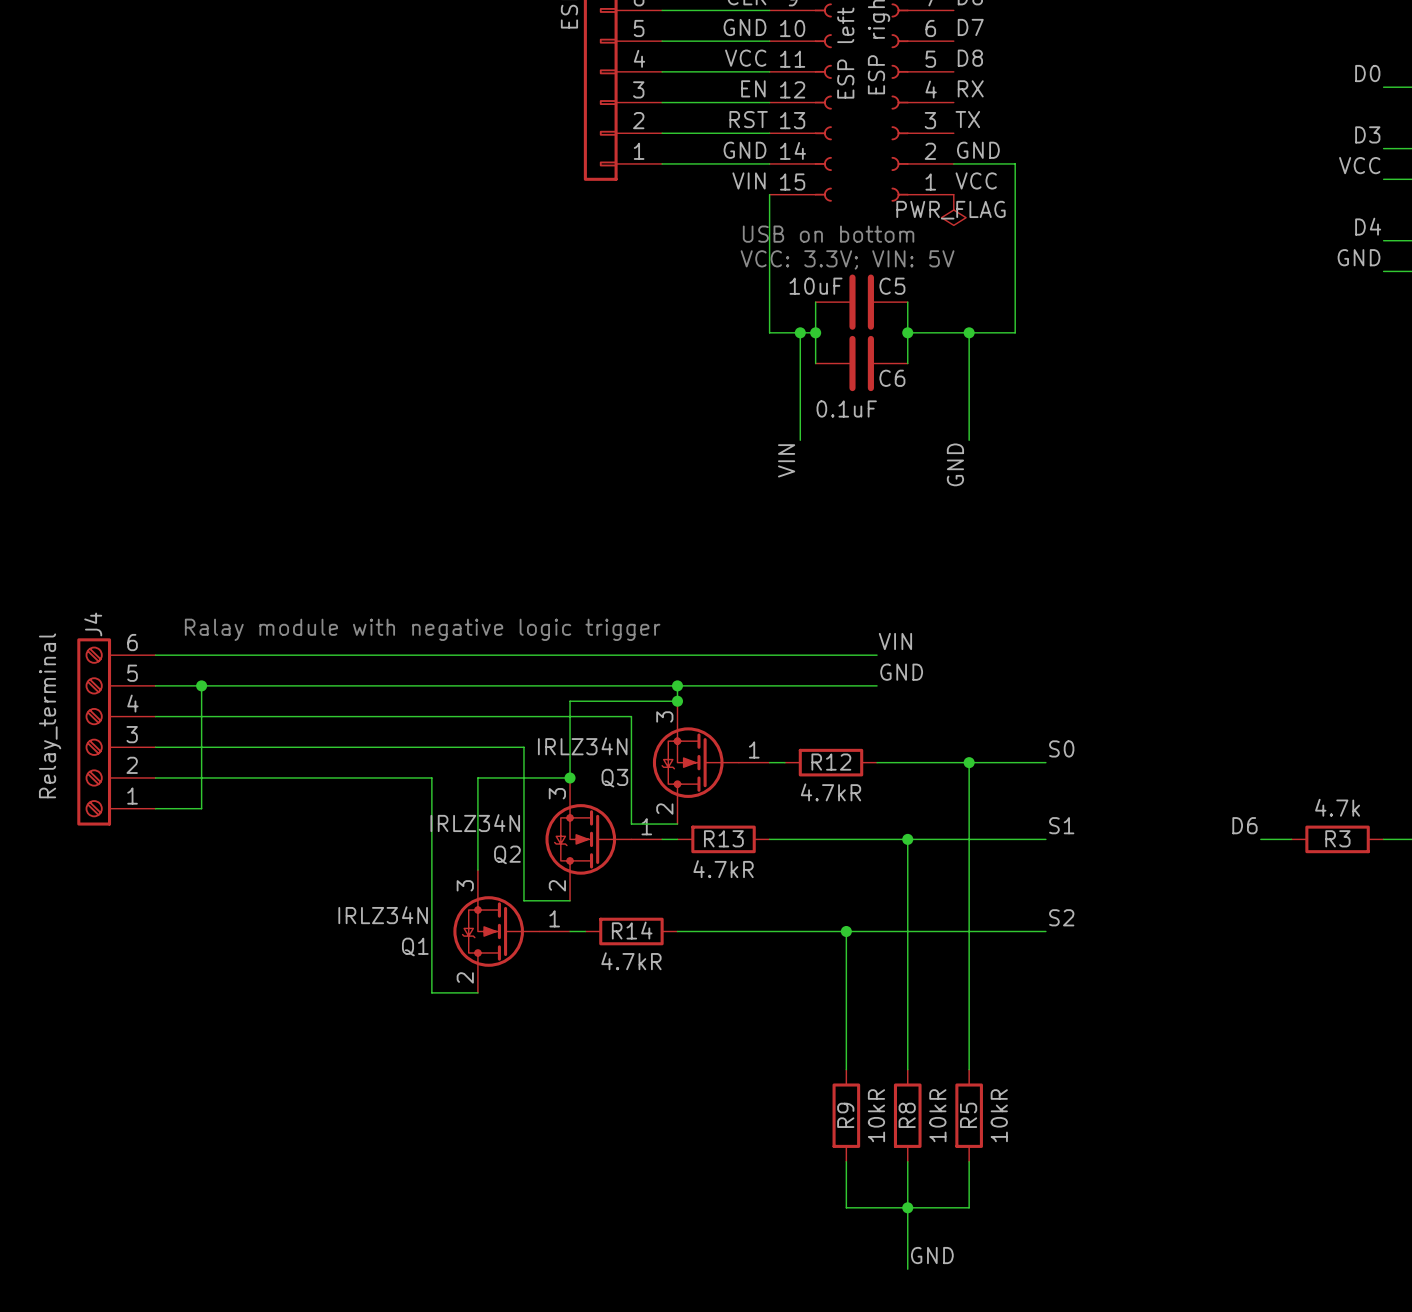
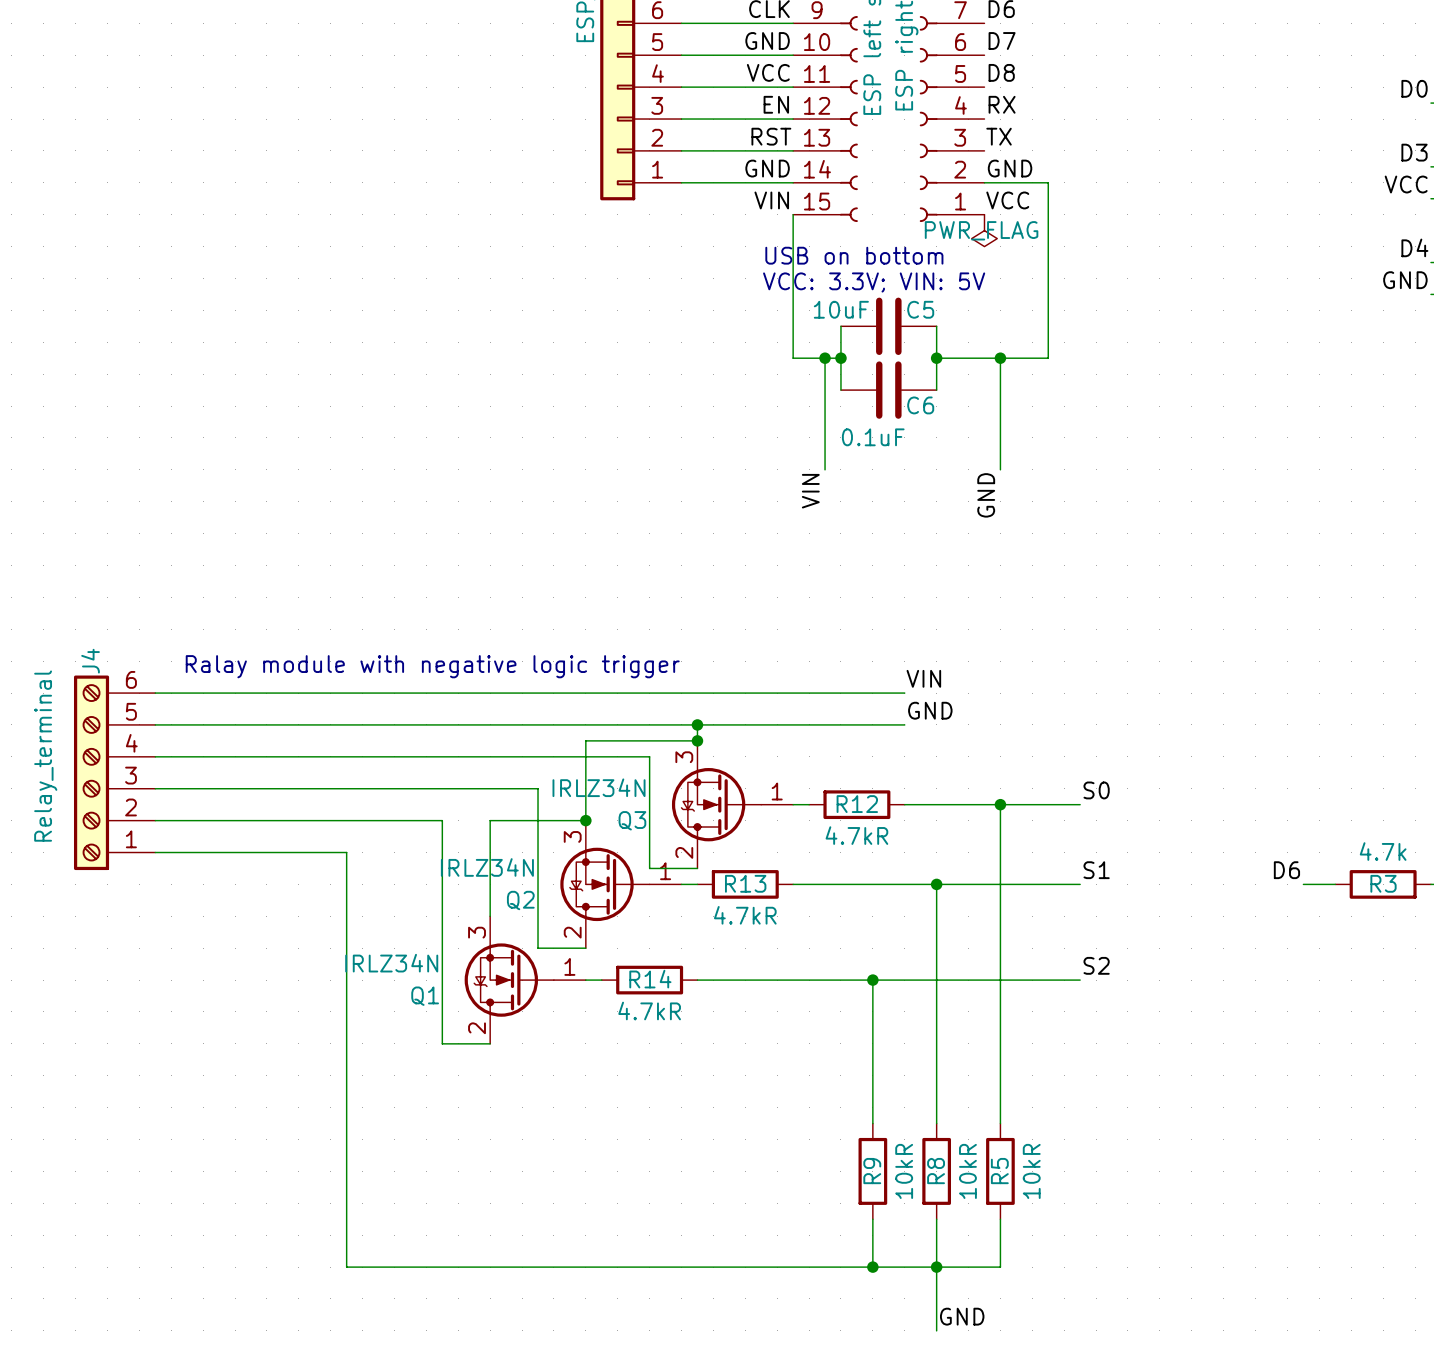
wire: (201, 685) (201, 808) -> (872, 1267) (346, 1267) (346, 852) (203, 852)
junction: (201, 685) -> none
junction: none -> (872, 1267)

